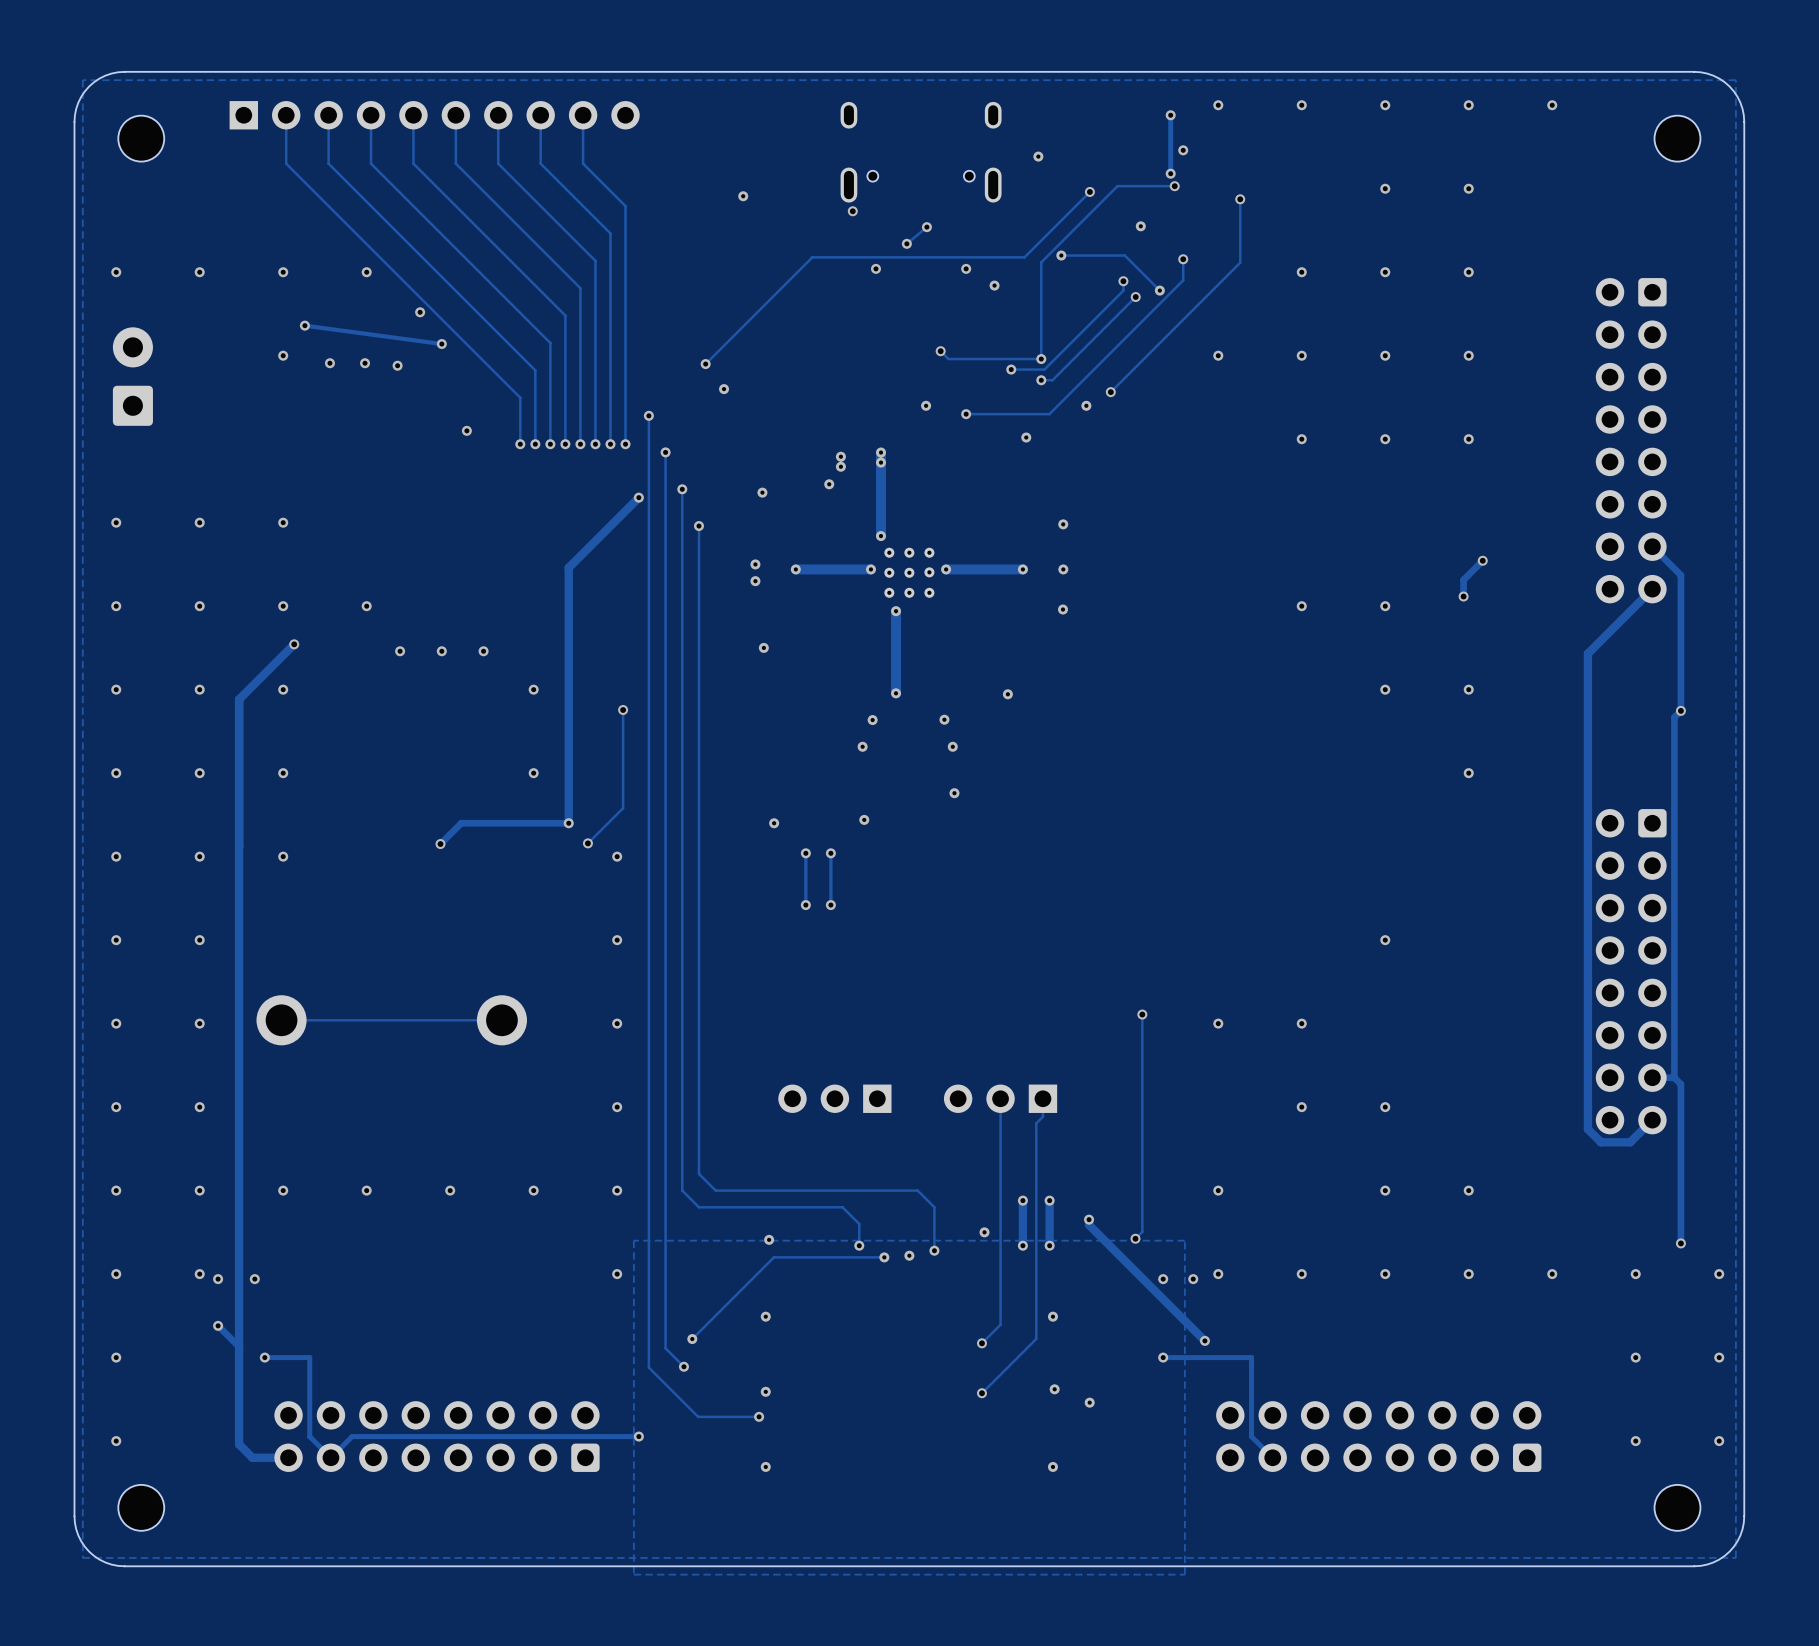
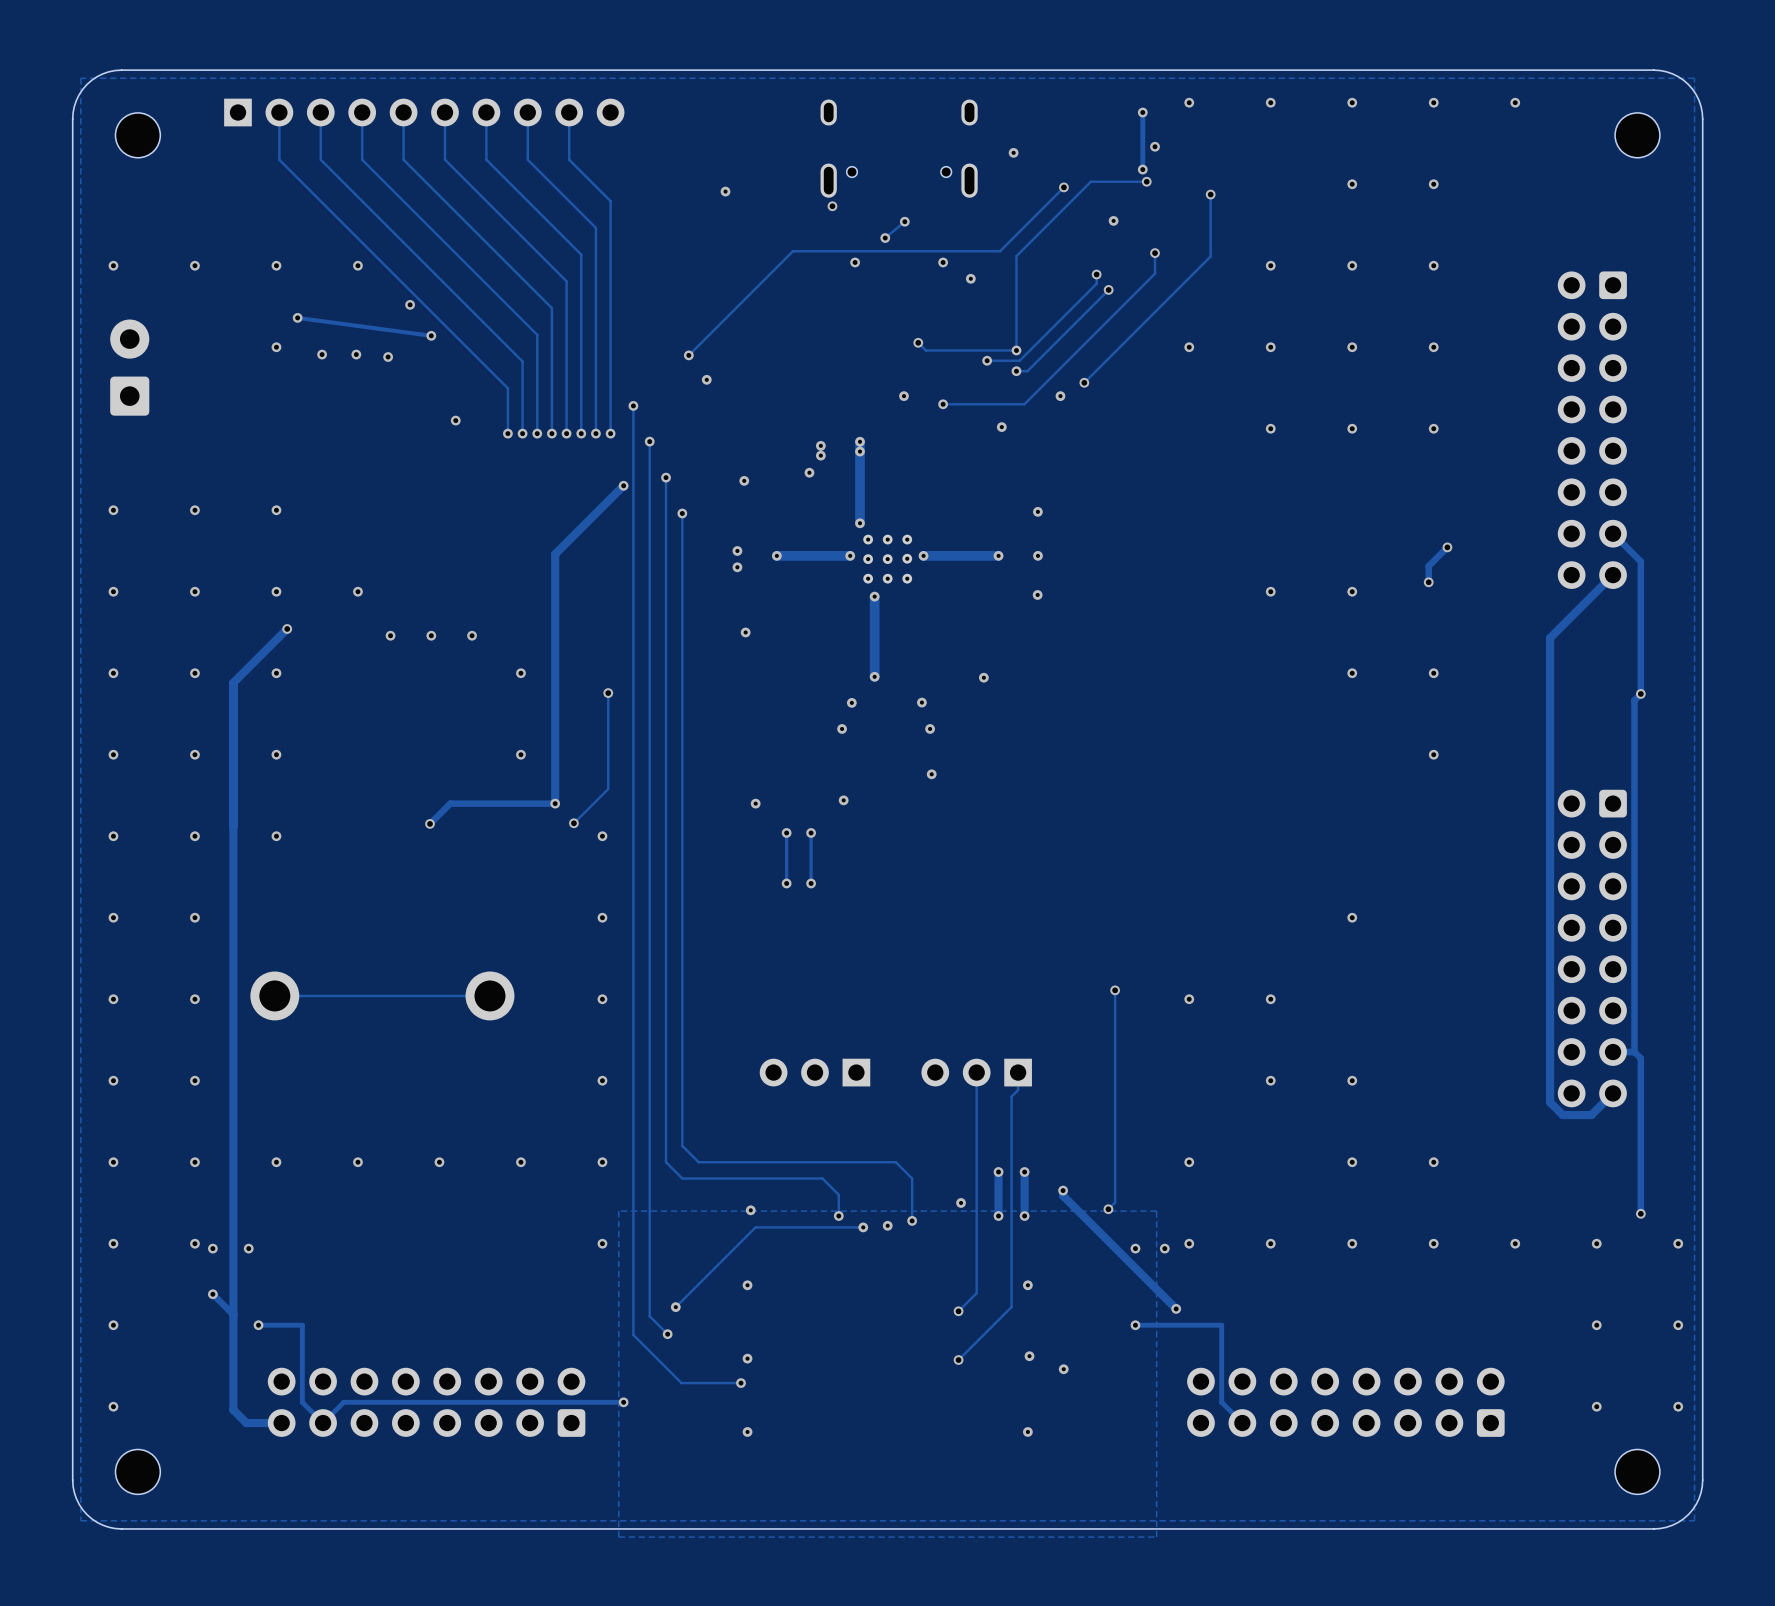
track: (1061, 255) (1124, 255) (1159, 290) -> none
via: (1061, 255) -> none
via: (1159, 290) -> none

